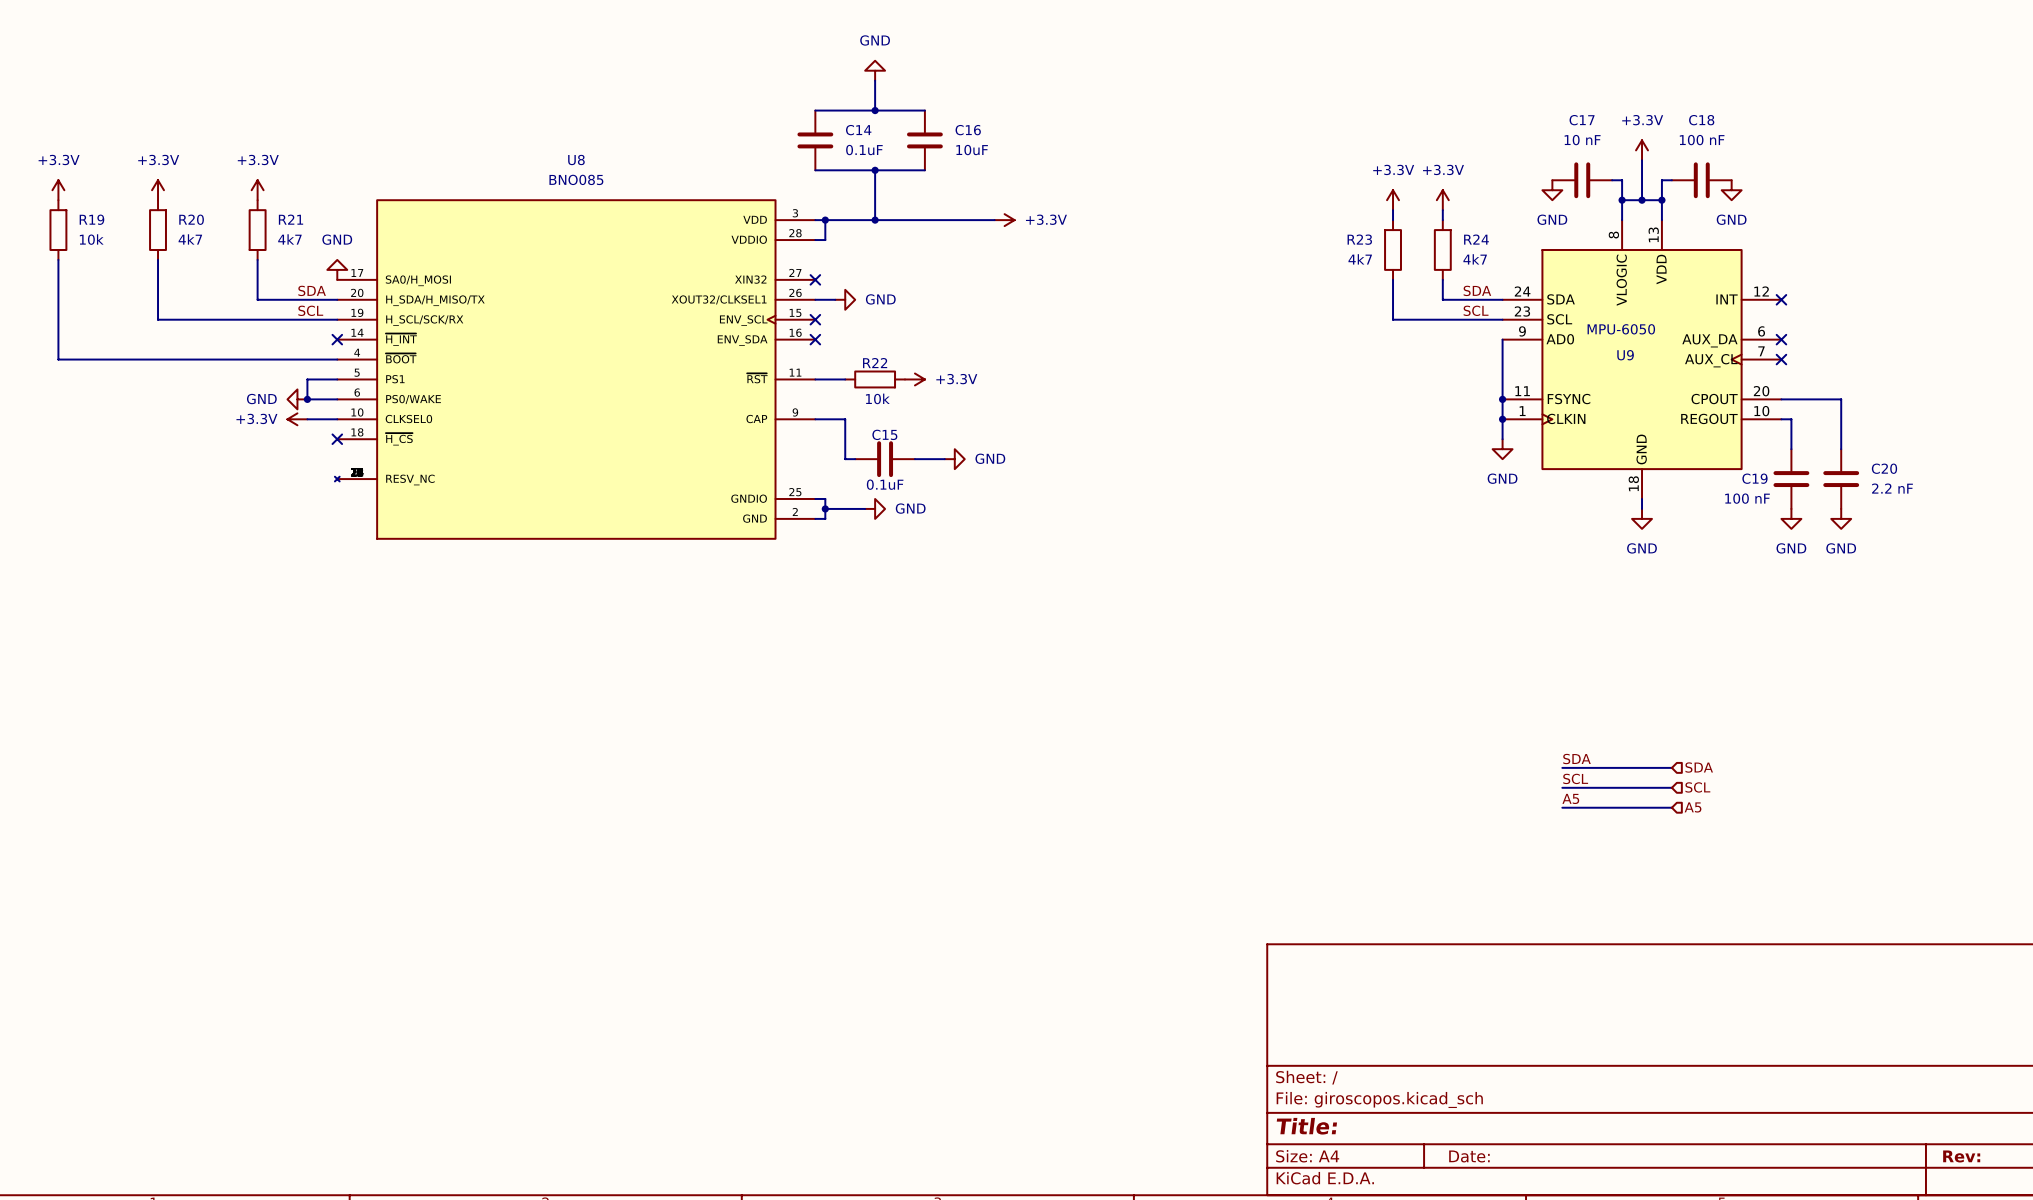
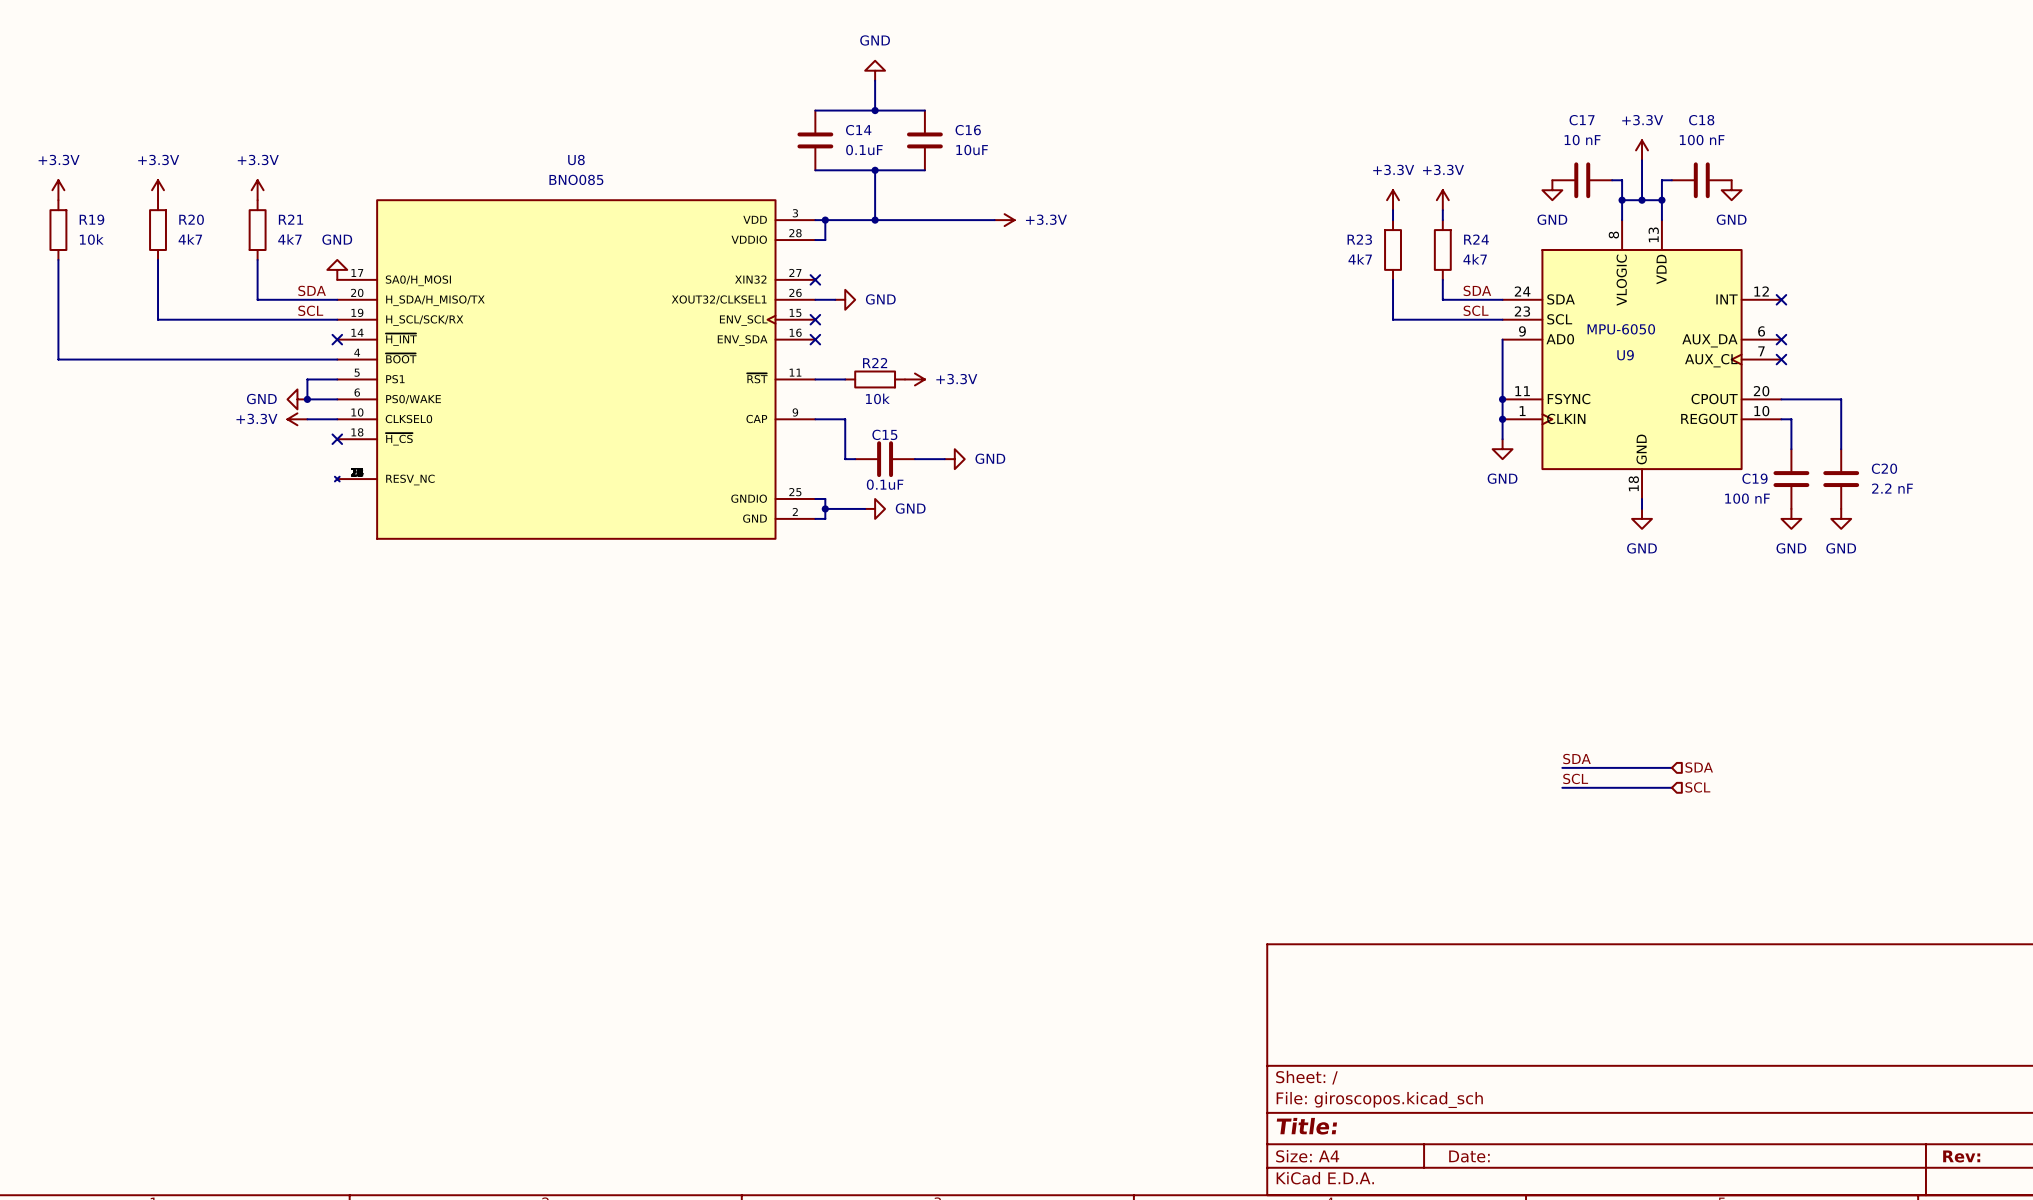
label: A5 (1570, 798) -> none
wire: (1562, 807) (1671, 807) -> none
hierarchical label: A5 (1693, 807) -> none

